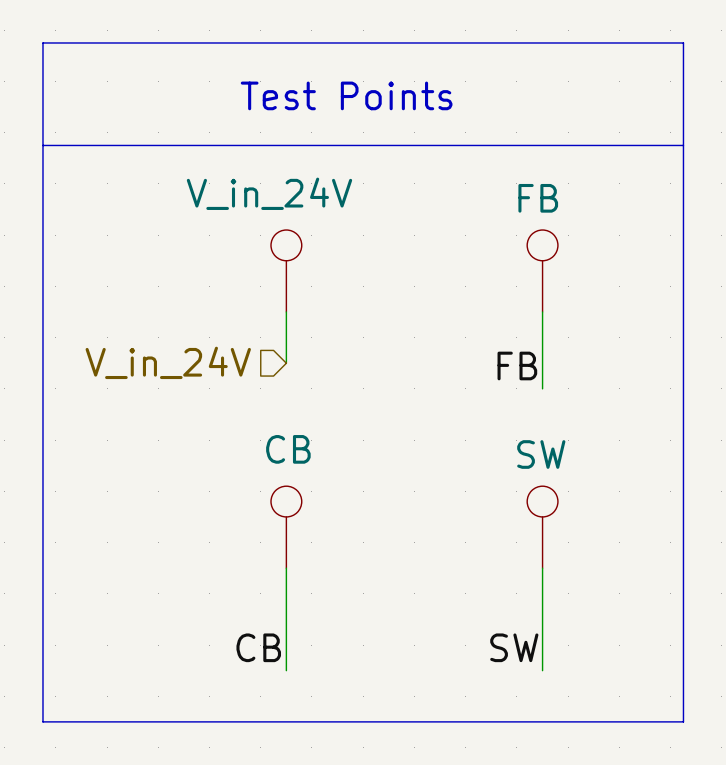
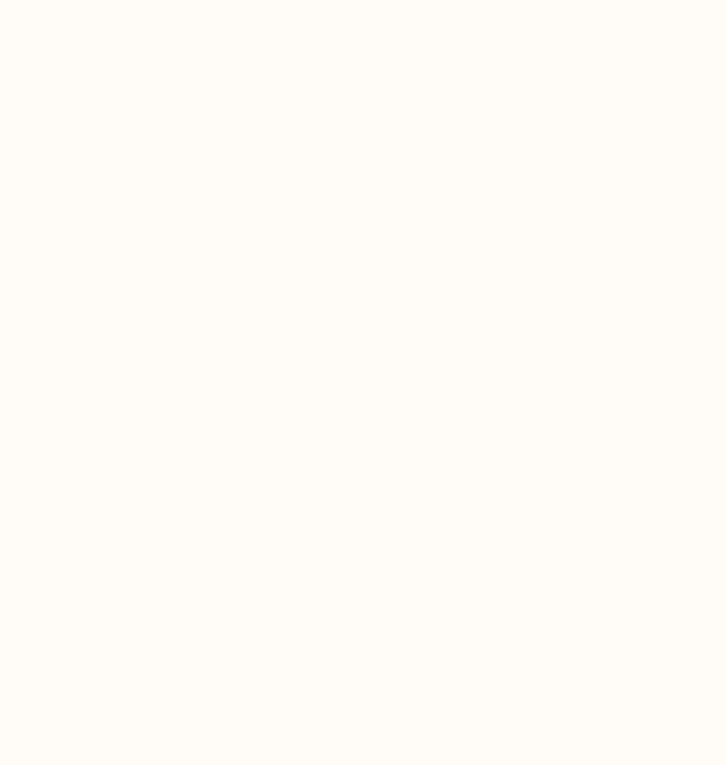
line: (42, 42) (683, 42) (683, 721) (42, 721) (42, 42) -> none
text: Test Points (346, 95) -> none
line: (42, 145) (683, 145) -> none
part: V_in_24V (286, 271) -> none
part: FB (542, 271) -> none
wire: (286, 311) (286, 363) -> none
wire: (542, 311) (542, 388) -> none
hierarchical label: V_in_24V (168, 362) -> none
label: FB (517, 365) -> none
part: CB (286, 527) -> none
part: SW (542, 527) -> none
wire: (286, 568) (286, 670) -> none
wire: (542, 568) (542, 670) -> none
label: CB (258, 647) -> none
label: SW (514, 647) -> none

